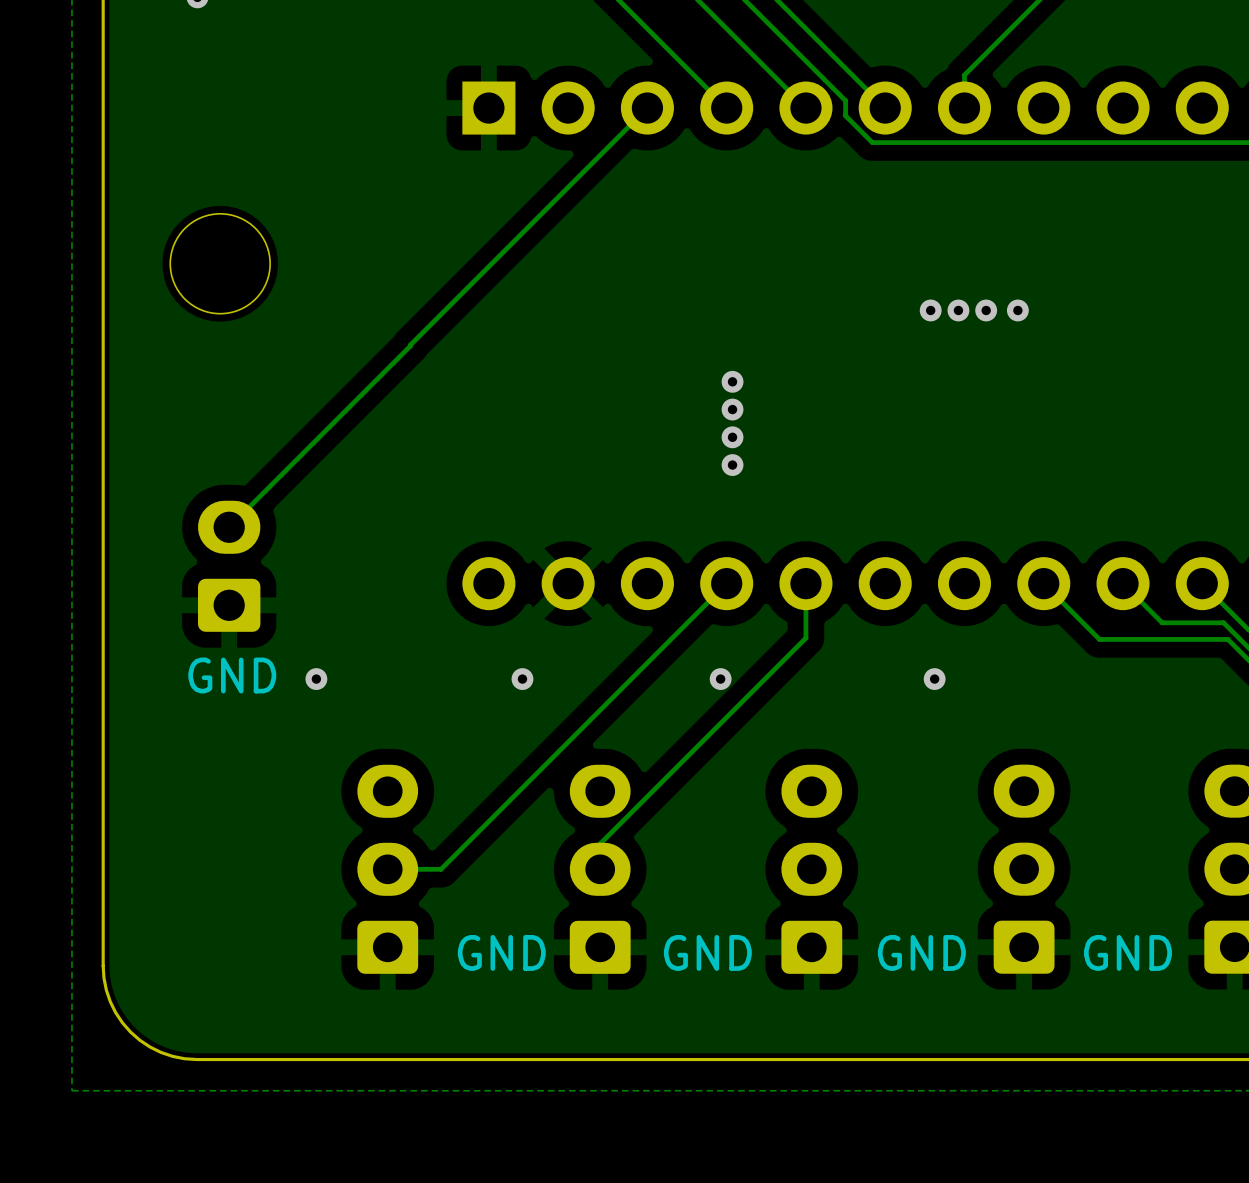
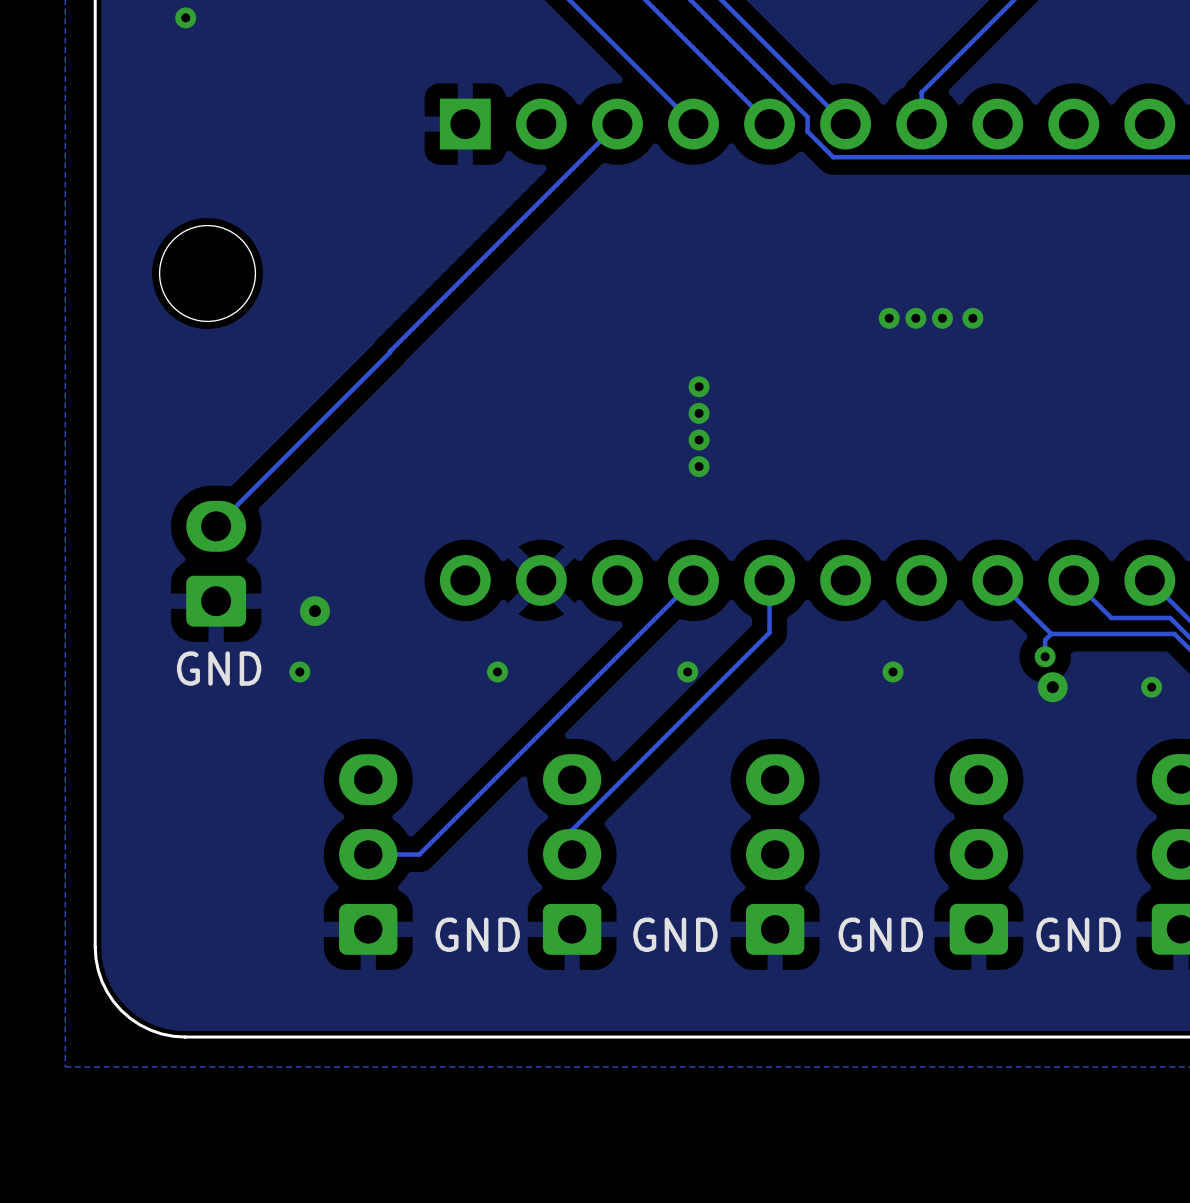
via: none -> (315, 611)
track: none -> (1051, 633) (1045, 640) (1045, 656)
via: none -> (1045, 656)
via: none -> (1052, 687)
via: none -> (1151, 687)

